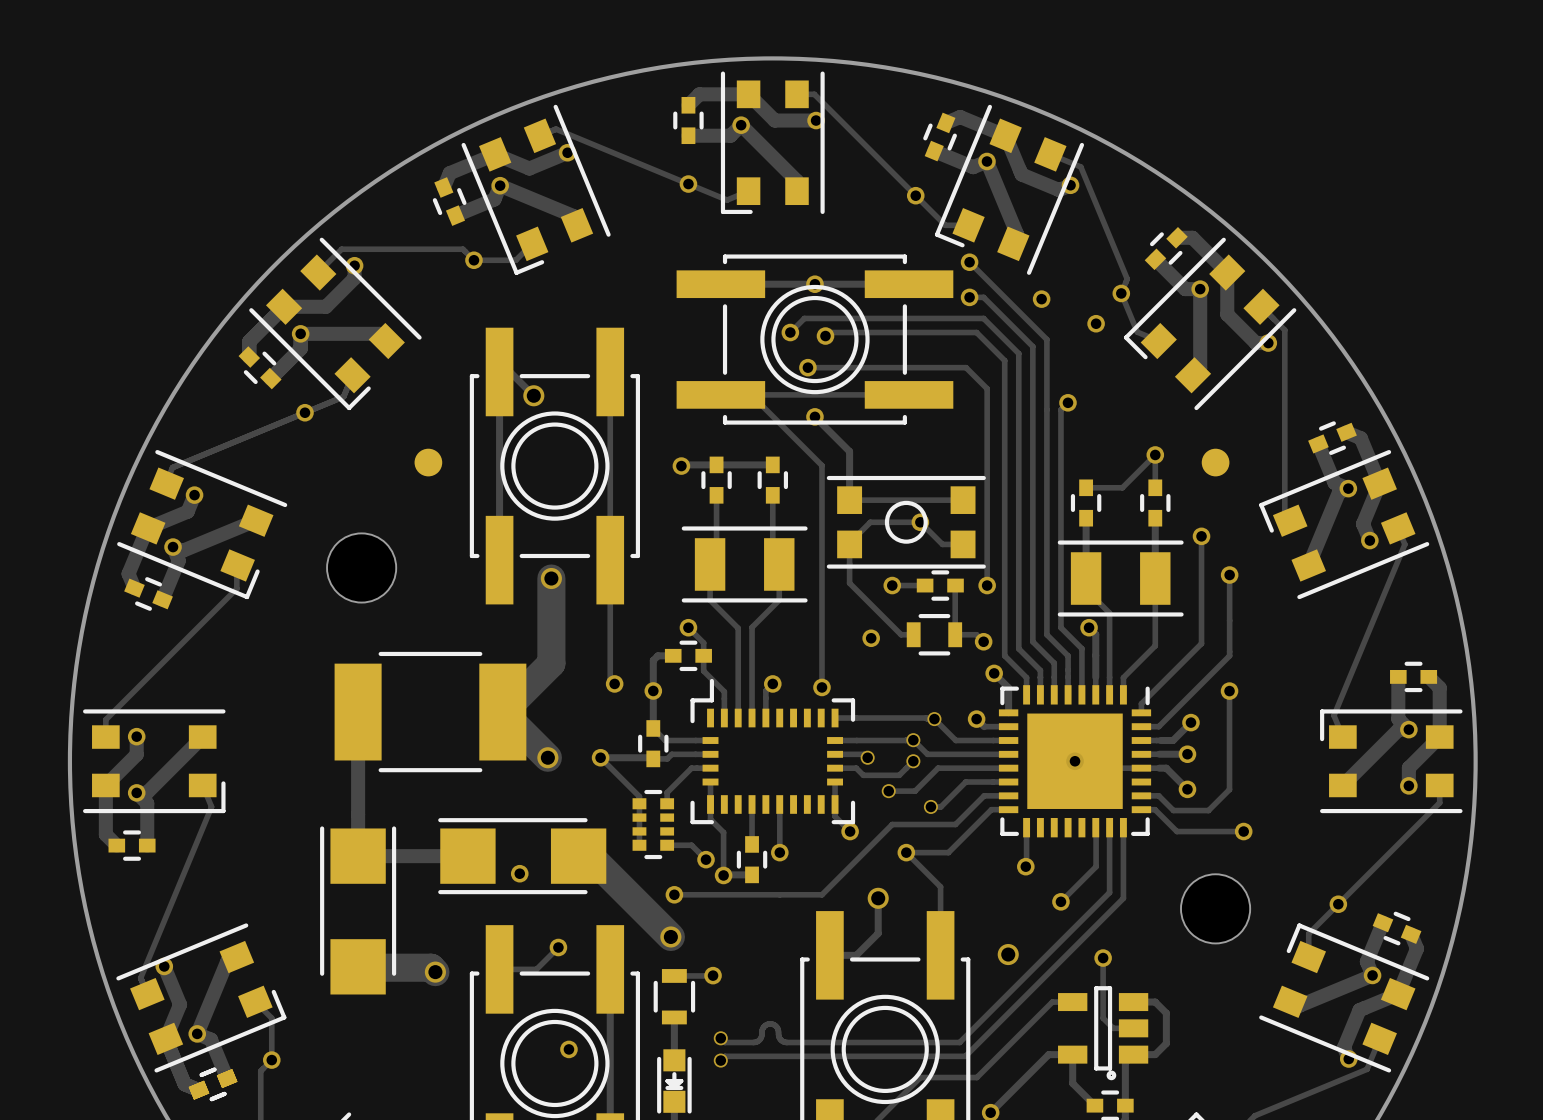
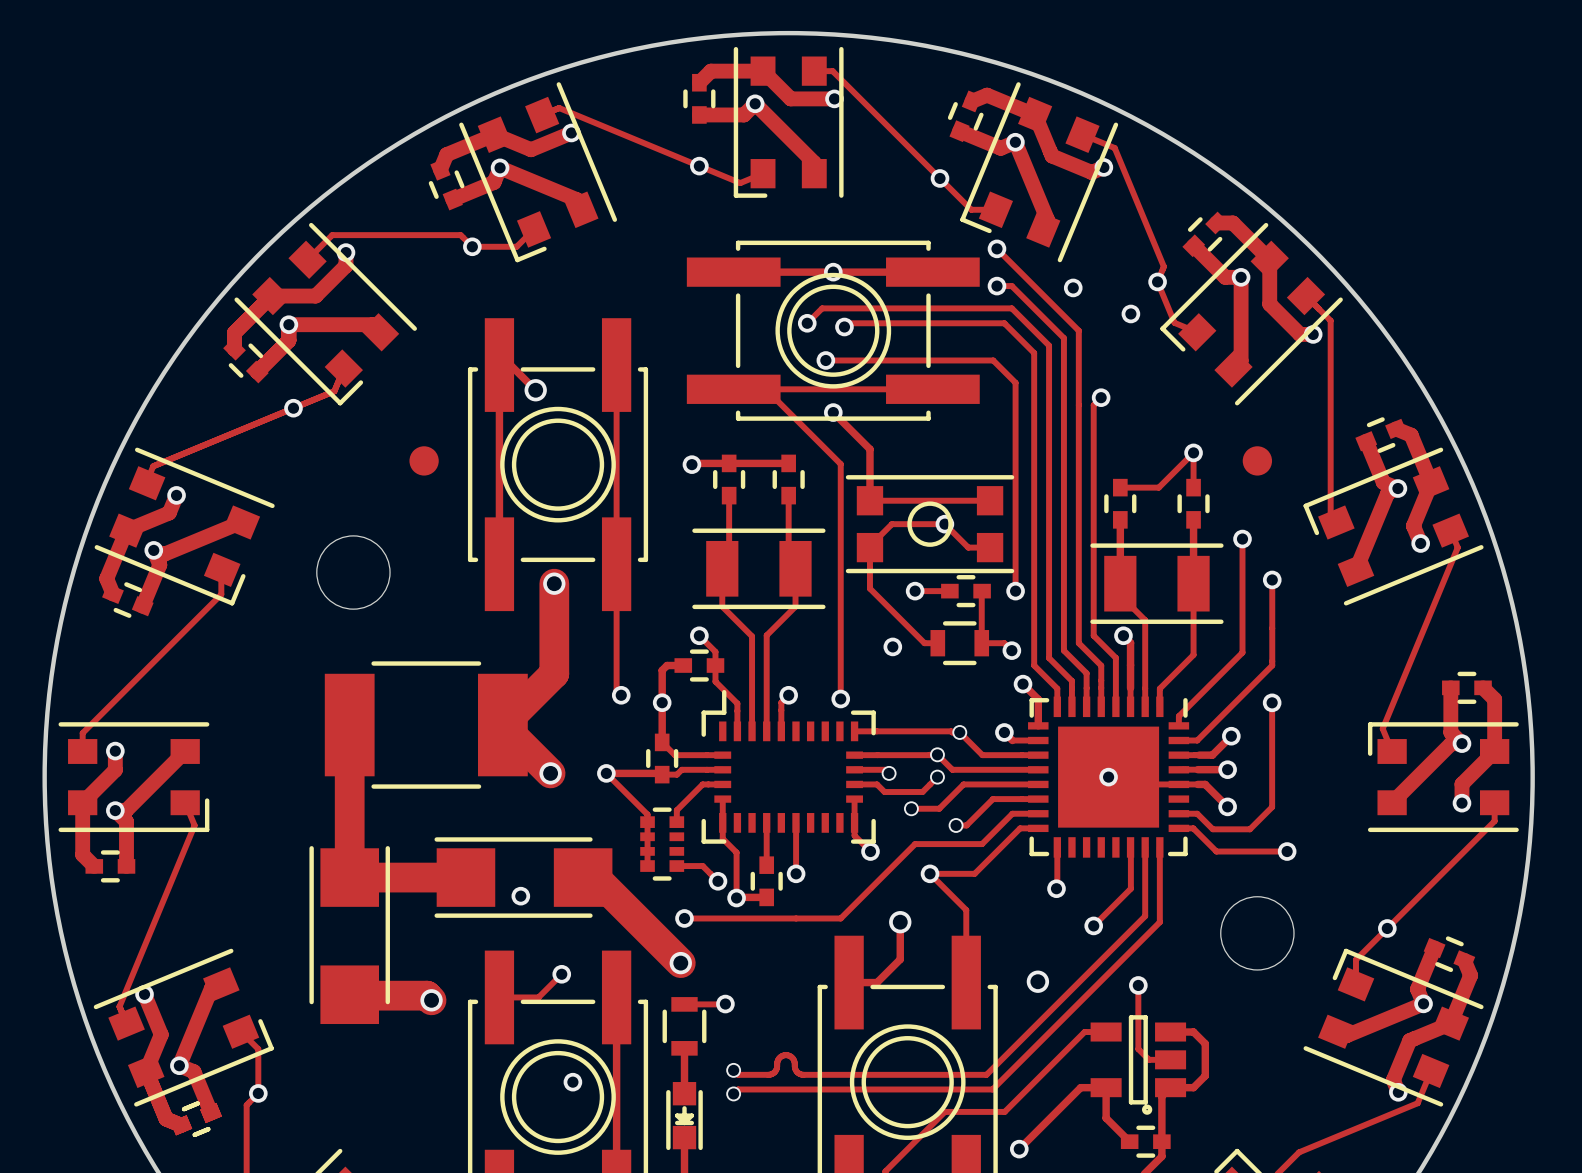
track width: thin (358, 712) (358, 856) (467, 856) -> thick (349, 725) (349, 877) (465, 877)

